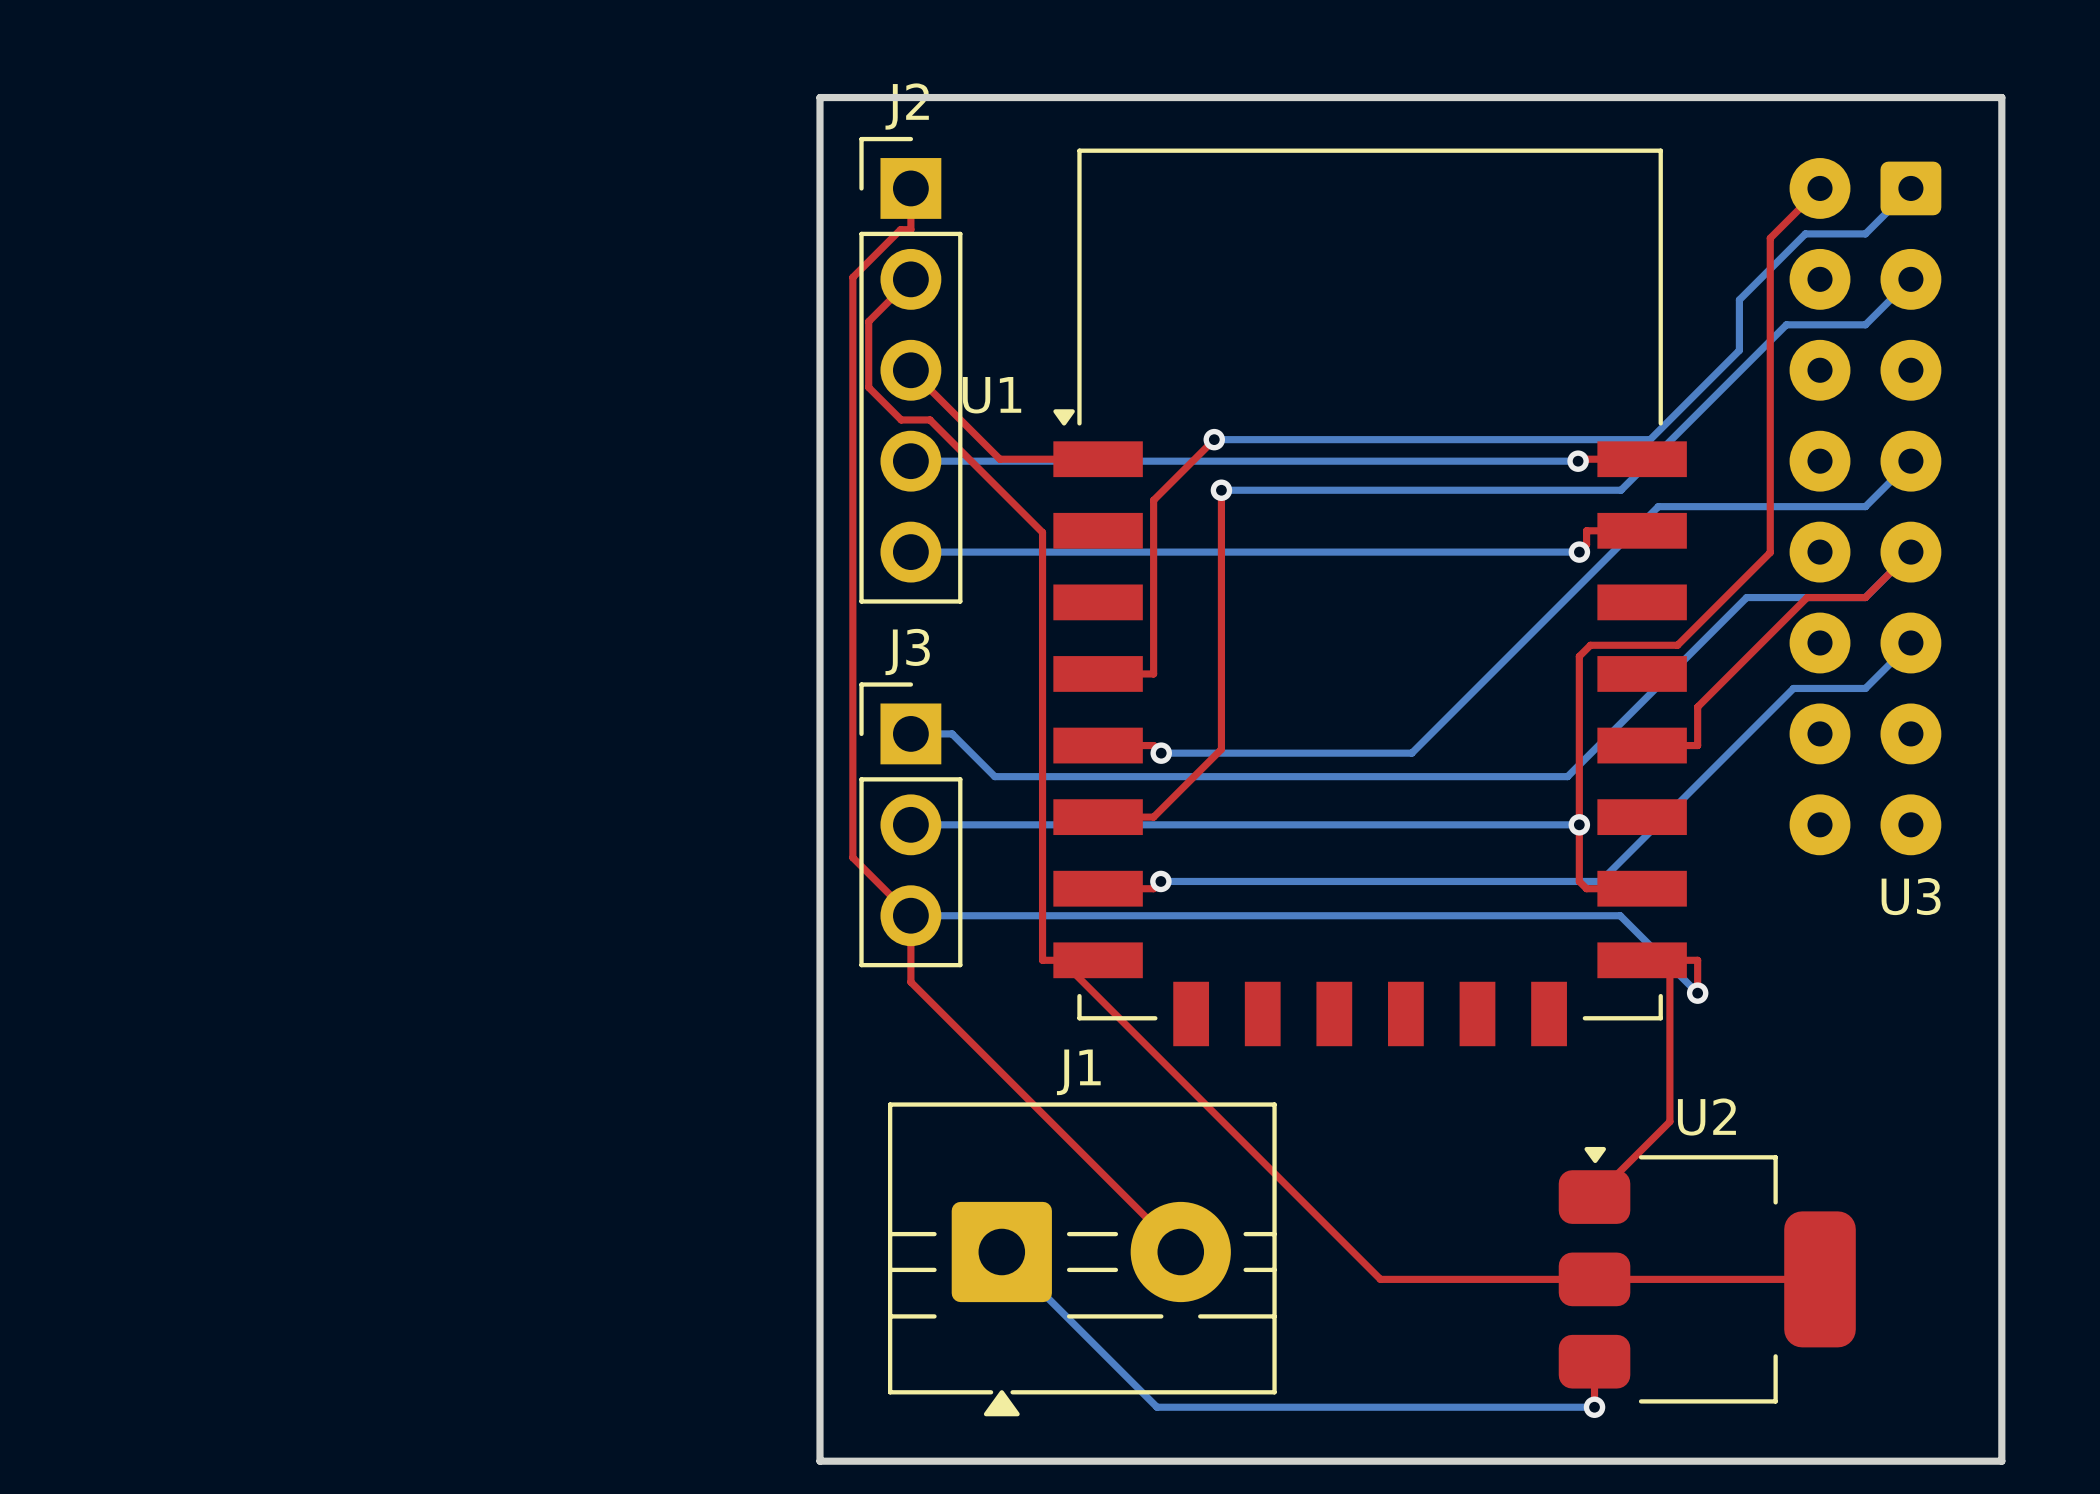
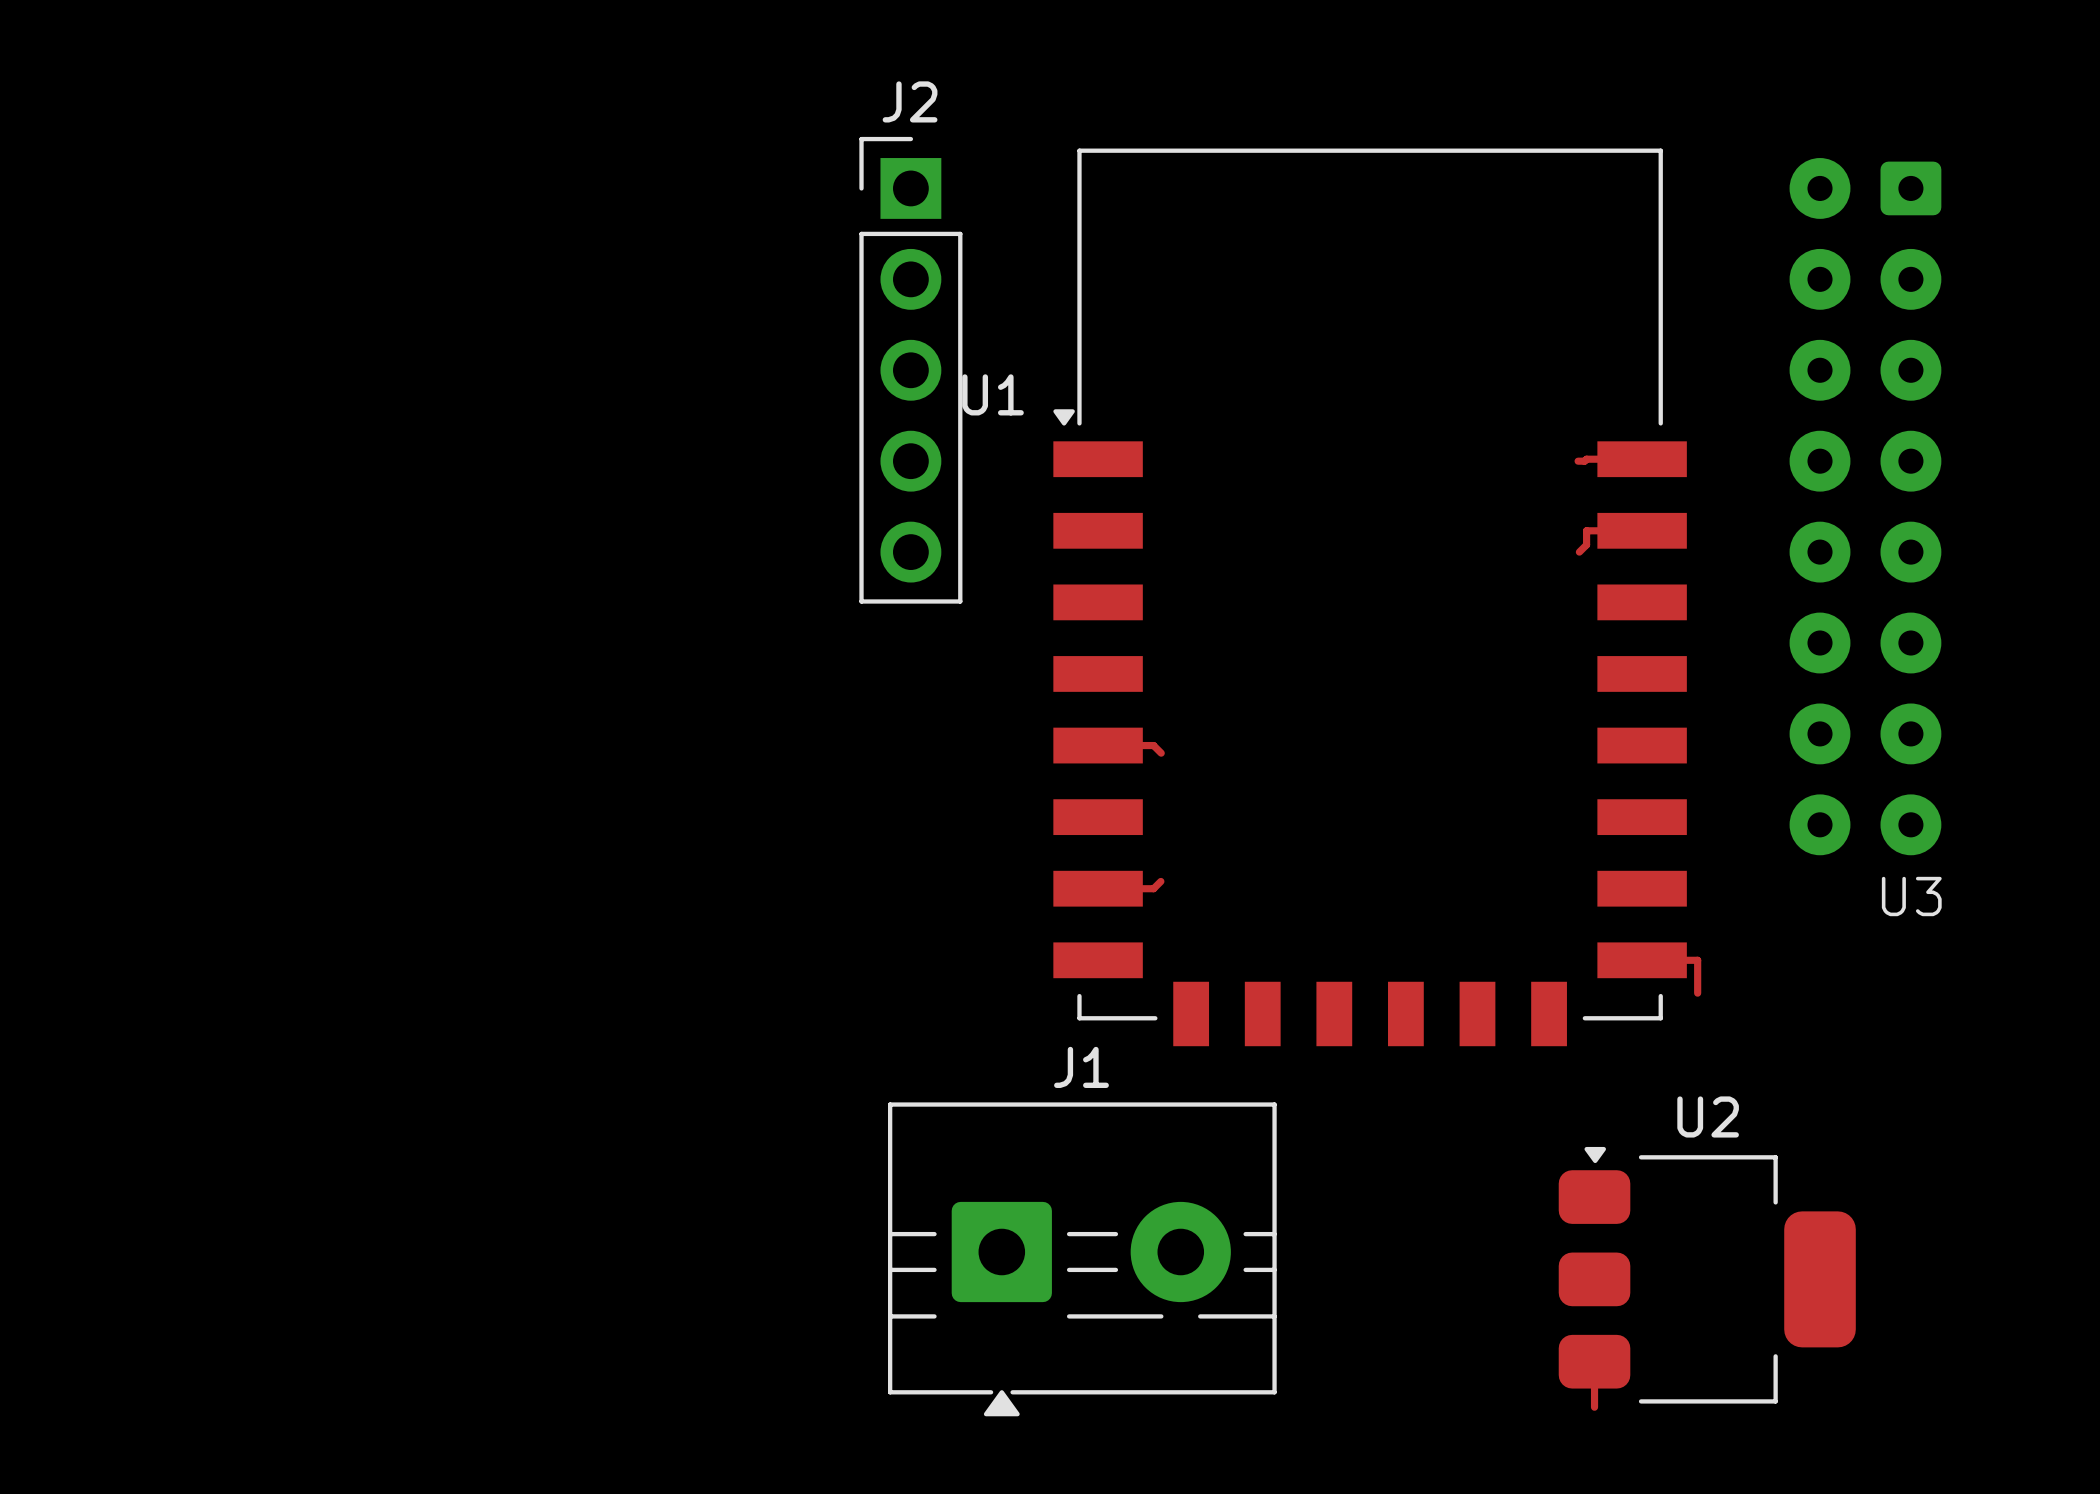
board edge: (819, 97) (2001, 97) (2001, 1461) (819, 1461) (819, 97) -> none
top track: (910, 188) (910, 229) (900, 229) (852, 277) (852, 857) (910, 915) (910, 982) (1180, 1252) -> none
top track: (1820, 188) (1770, 238) (1770, 552) (1677, 645) (1590, 645) (1579, 656) (1579, 881) (1586, 888) (1642, 888) -> none
bottom track: (1910, 188) (1865, 233) (1805, 233) (1739, 299) (1739, 350) (1650, 439) (1214, 439) -> none
top track: (910, 279) (868, 321) (868, 387) (901, 419) (930, 419) (1042, 532) (1042, 960) (1098, 960) -> none
bottom track: (1910, 279) (1865, 324) (1786, 324) (1620, 490) (1221, 490) -> none
top track: (910, 370) (999, 459) (1098, 459) -> none
top track: (1214, 439) (1153, 500) (1153, 673) (1098, 673) -> none
via: (1214, 439) -> none
bottom track: (910, 461) (1578, 461) -> none
via: (1578, 461) -> none
bottom track: (1910, 461) (1865, 506) (1658, 506) (1411, 753) (1161, 753) -> none
top track: (1221, 490) (1221, 749) (1153, 817) (1098, 817) -> none
via: (1221, 490) -> none
bottom track: (910, 552) (1579, 552) -> none
via: (1579, 552) -> none
top track: (1910, 552) (1865, 597) (1807, 597) (1697, 707) (1697, 745) (1642, 745) -> none
bottom track: (1910, 552) (1865, 597) (1746, 597) (1567, 776) (994, 776) (952, 733) (910, 733) -> none
bottom track: (1910, 643) (1865, 688) (1793, 688) (1600, 881) (1160, 881) -> none
via: (1161, 753) -> none
bottom track: (910, 824) (1579, 824) -> none
J3: (910, 824) -> none
via: (1579, 824) -> none
via: (1160, 881) -> none
bottom track: (910, 915) (1620, 915) (1697, 993) -> none
top track: (1061, 960) (1380, 1279) (1820, 1279) -> none
top track: (1669, 960) (1669, 1121) (1594, 1197) -> none
via: (1697, 993) -> none
bottom track: (1001, 1252) (1157, 1407) (1594, 1407) -> none
via: (1594, 1407) -> none

